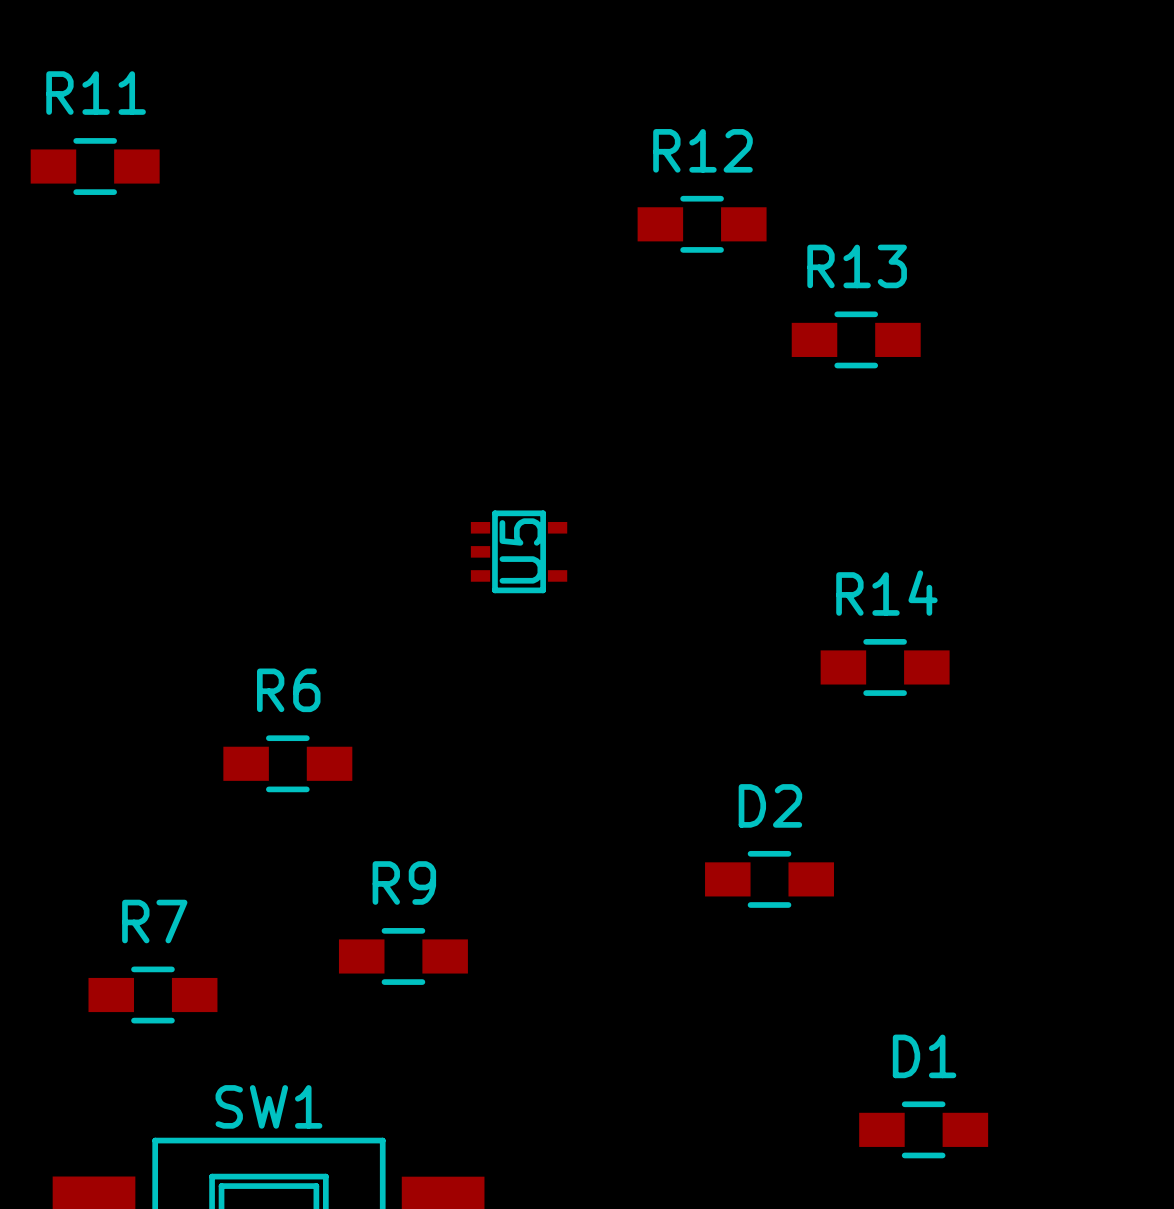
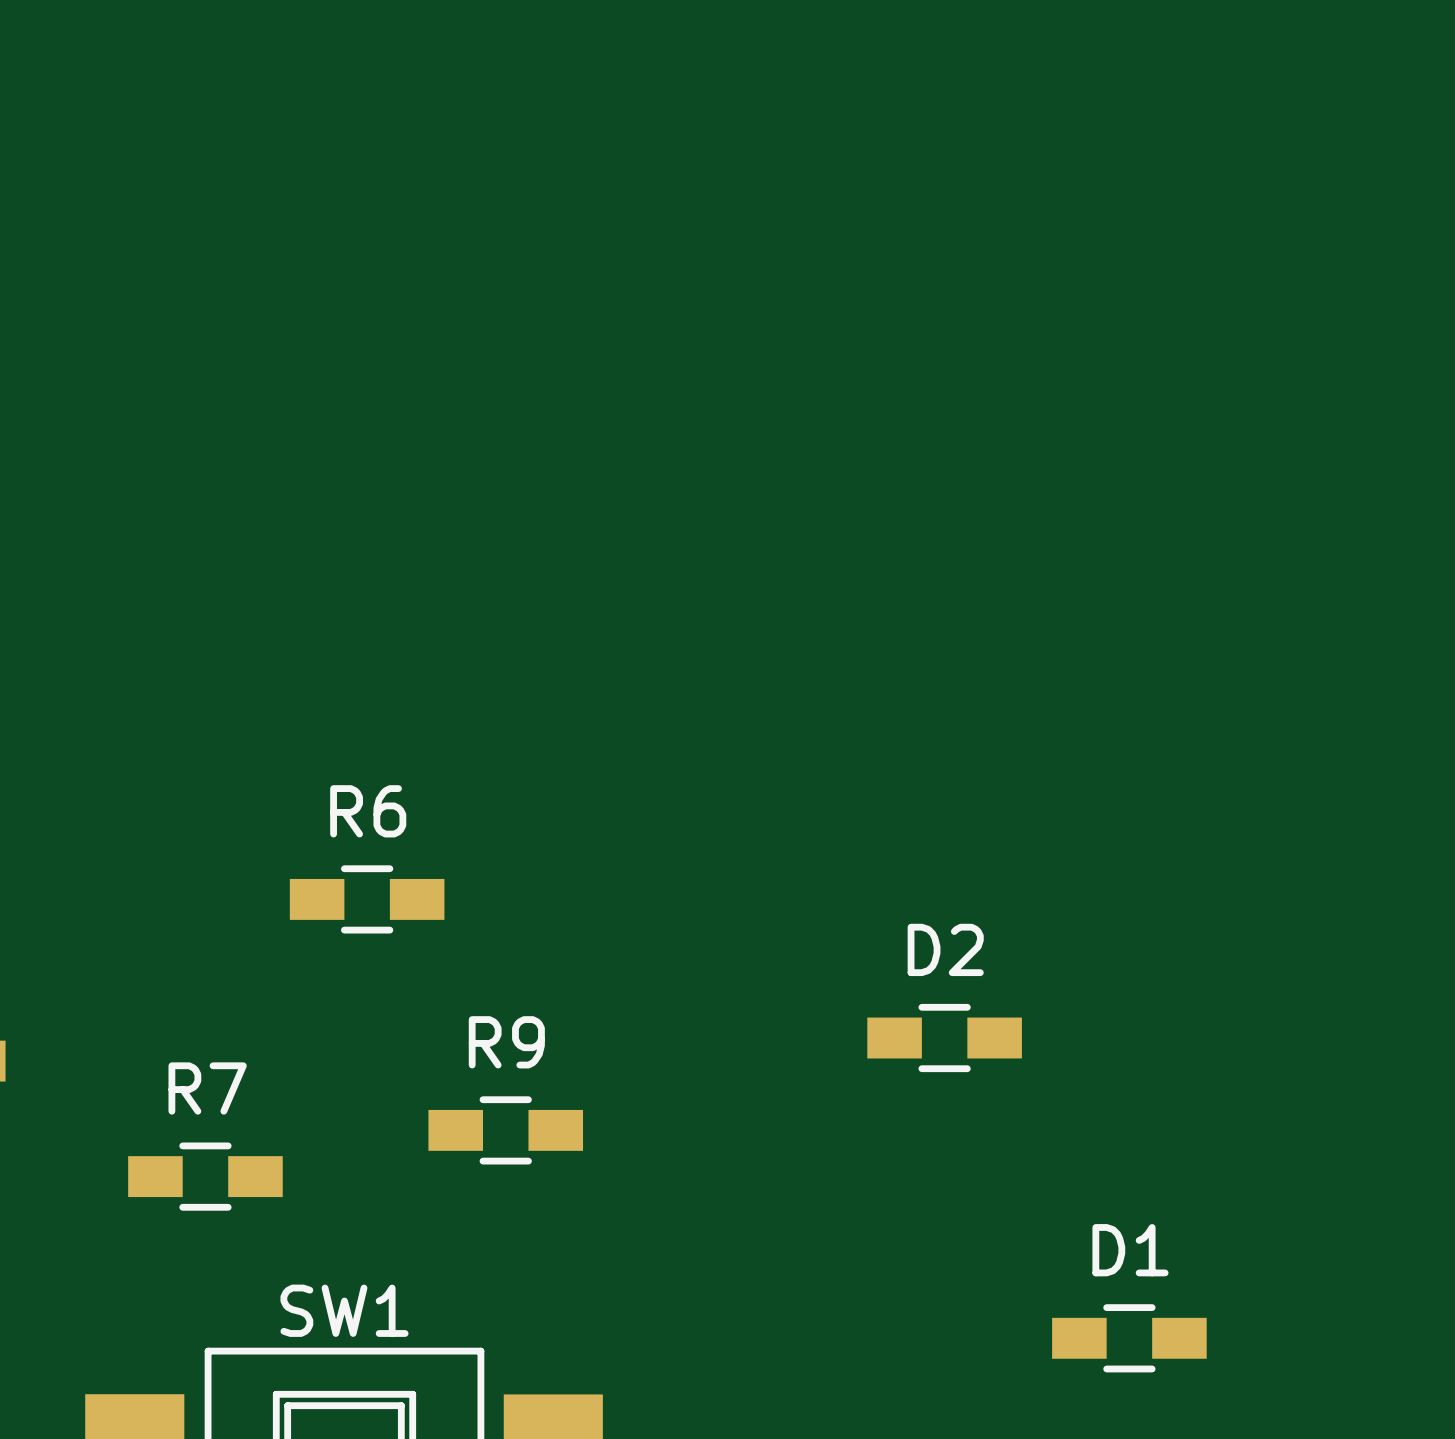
R11: (95, 166) -> none
R12: (702, 224) -> none
R13: (856, 339) -> none
U5: (519, 551) -> none
R14: (885, 667) -> none

